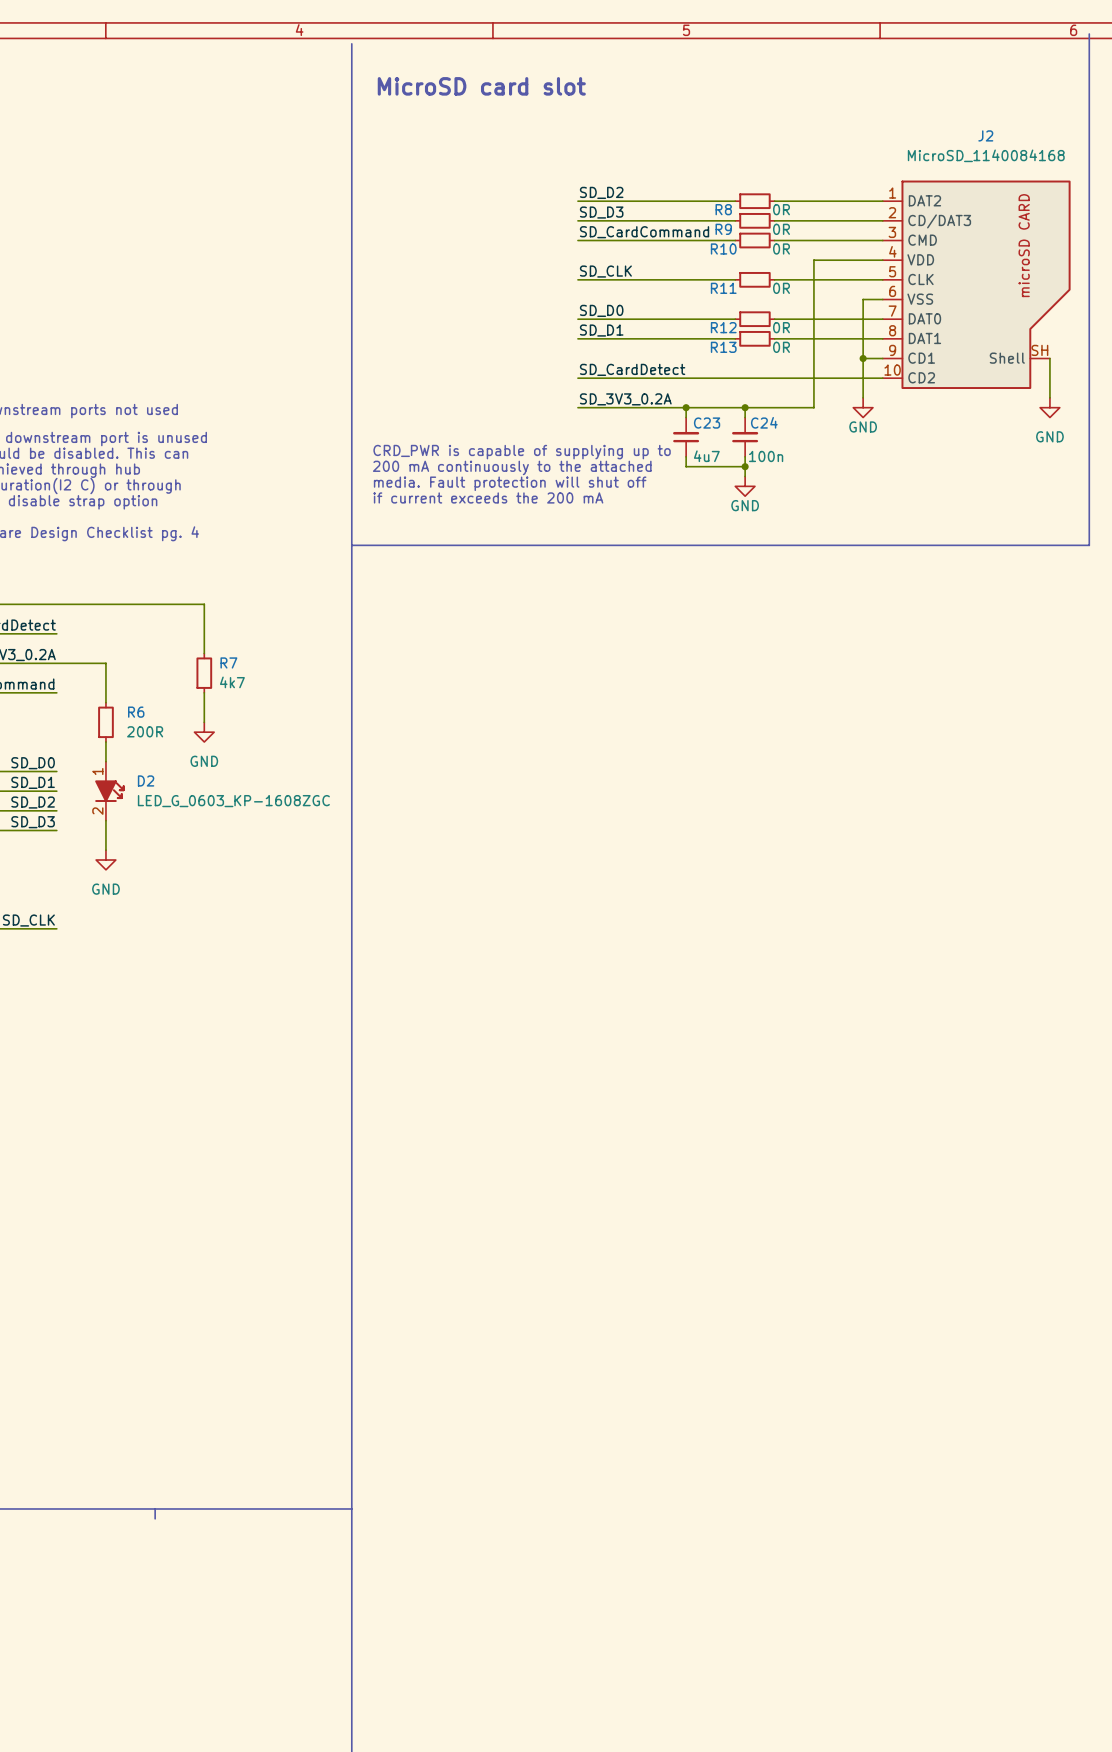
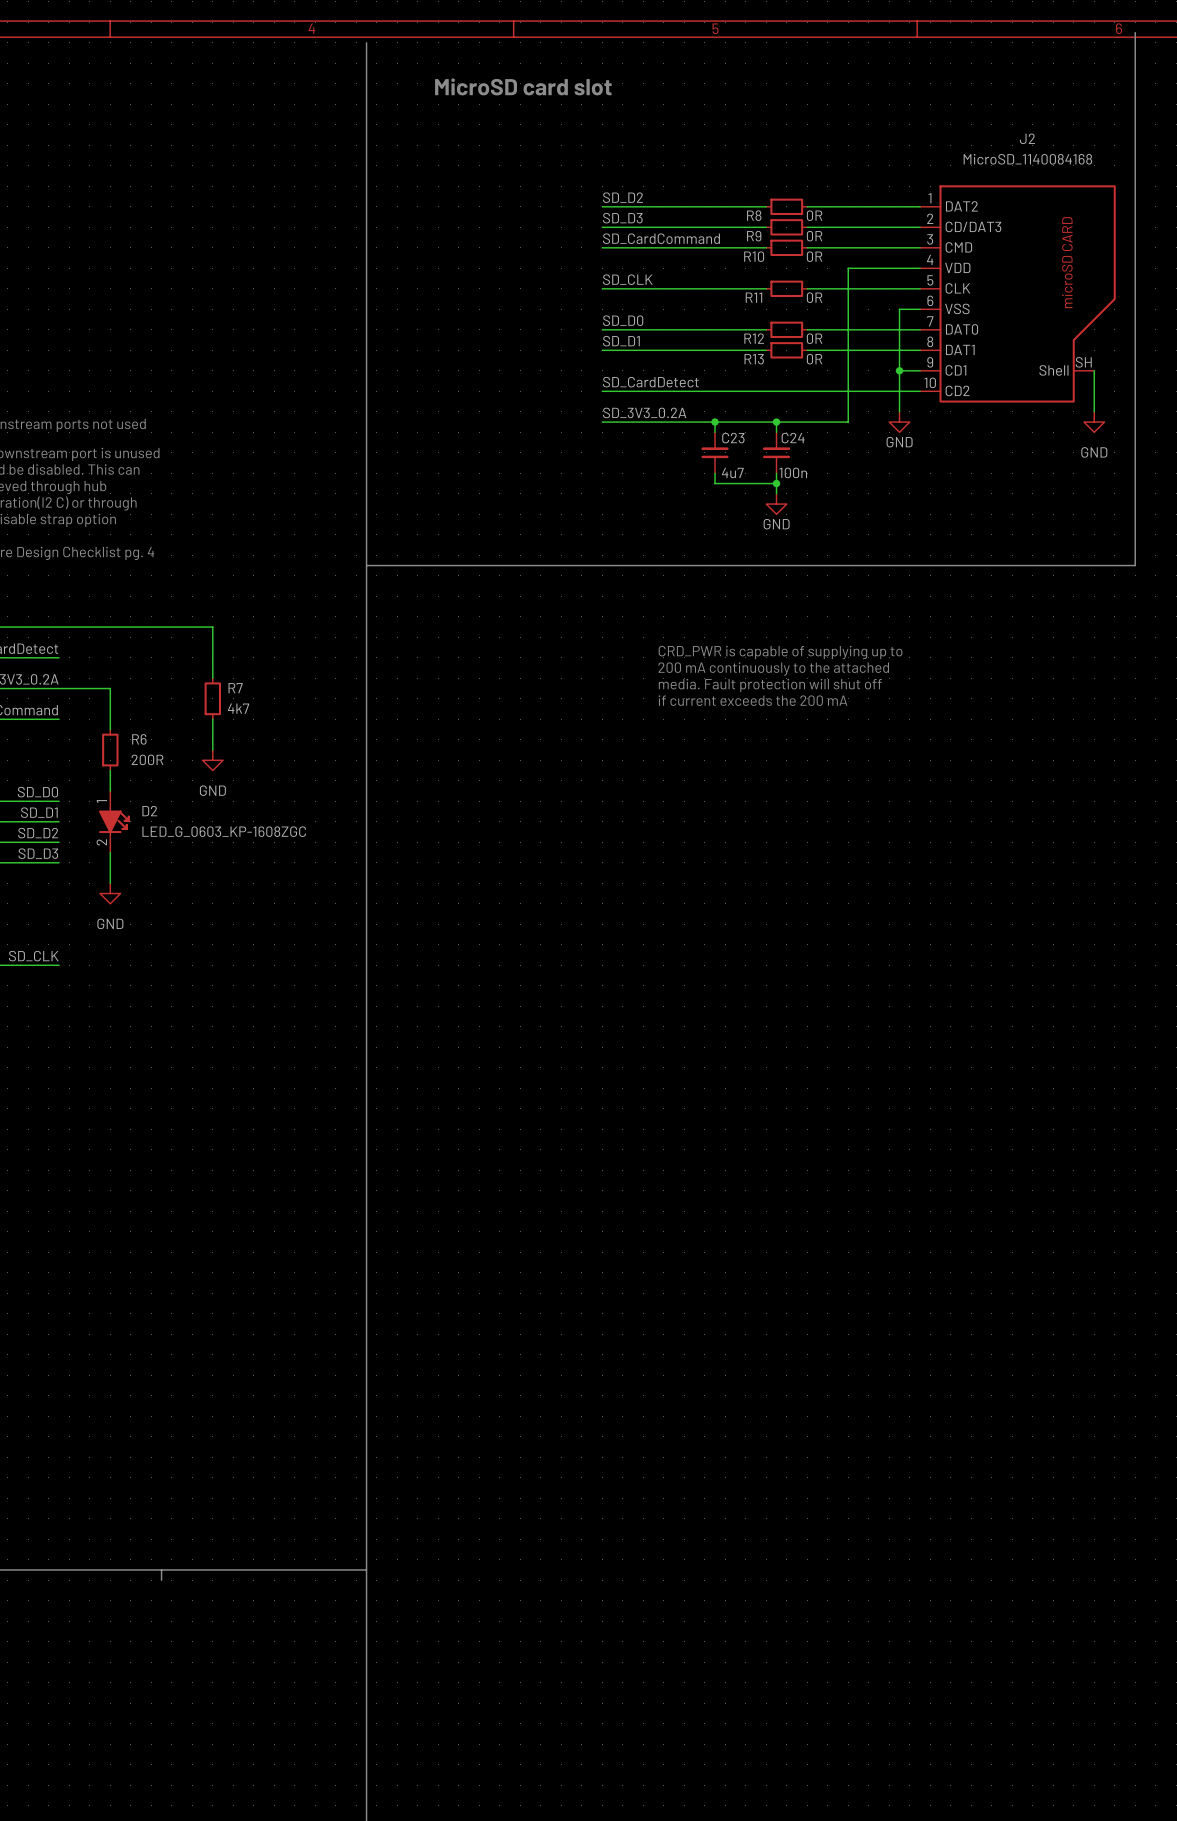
text: CRD_PWR is capable of supplying up to (522, 452) -> none
text: 200 mA continuously to the attached (512, 467) -> none
text: media. Fault protection will shut off (510, 483) -> none
text: if current exceeds the 200 mA (488, 497) -> none
text: none -> CRD_PWR is capable of supplying up to (780, 652)
text: none -> 200 mA continuously to the attached (773, 669)
text: none -> media. Fault protection will shut off (770, 685)
text: none -> if current exceeds the 200 mA (752, 700)

